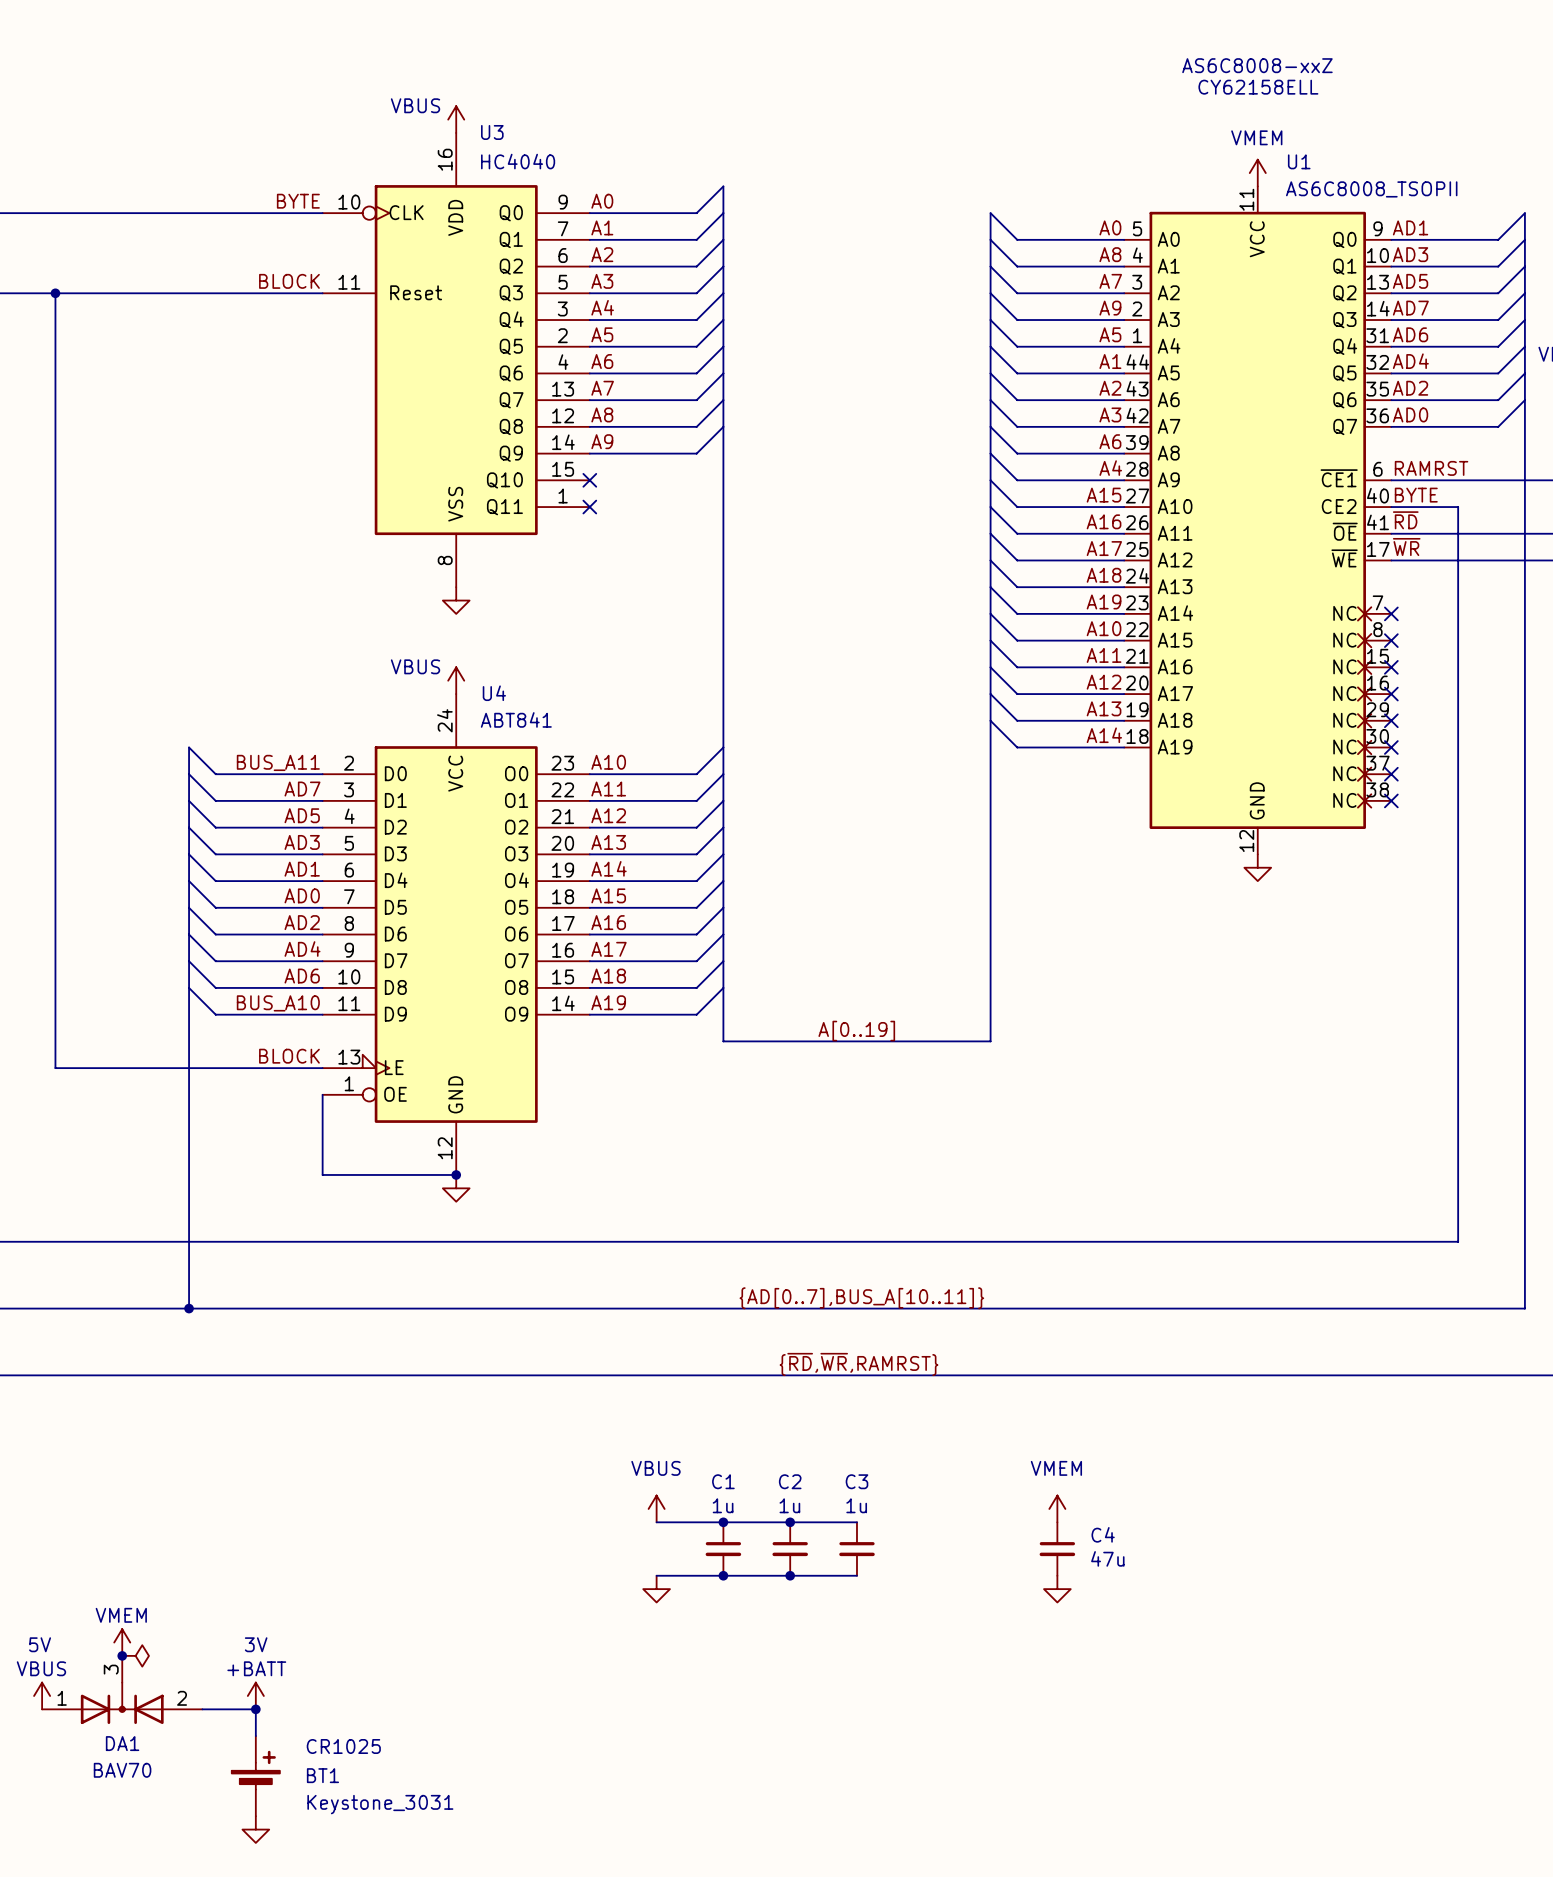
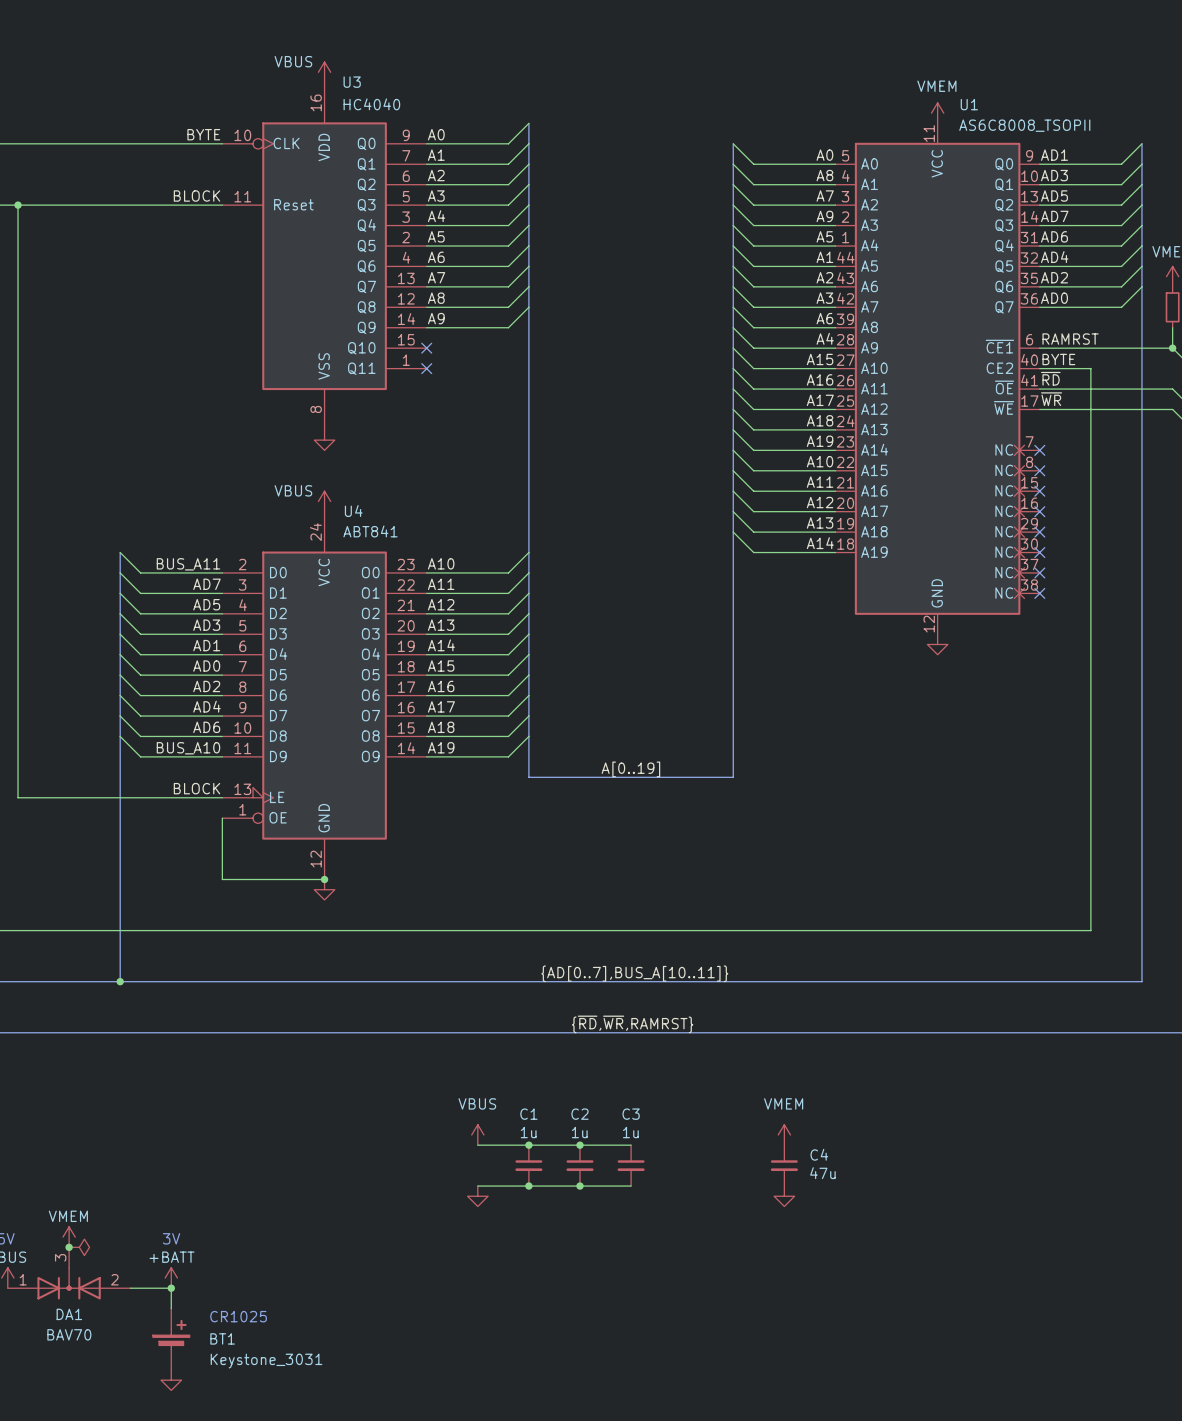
text: AS6C8008-xxZ (1257, 65) -> none
text: CY62158ELL (1258, 87) -> none

